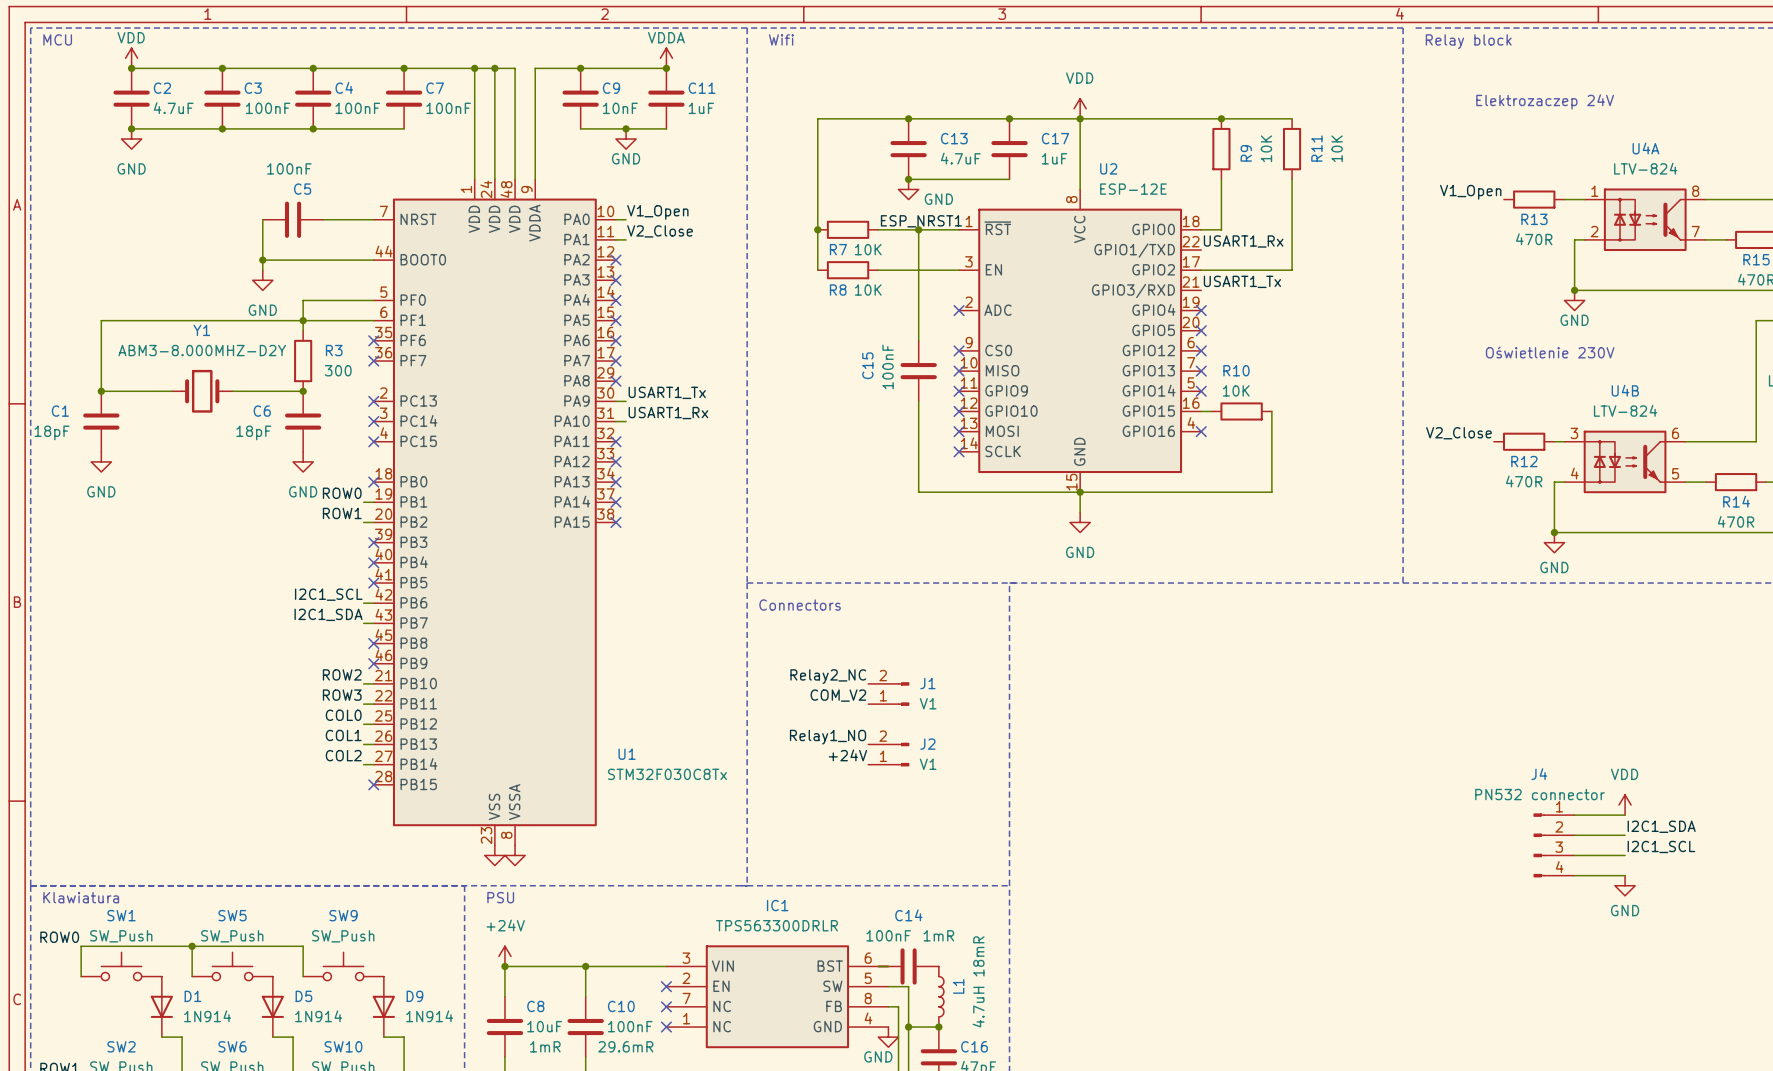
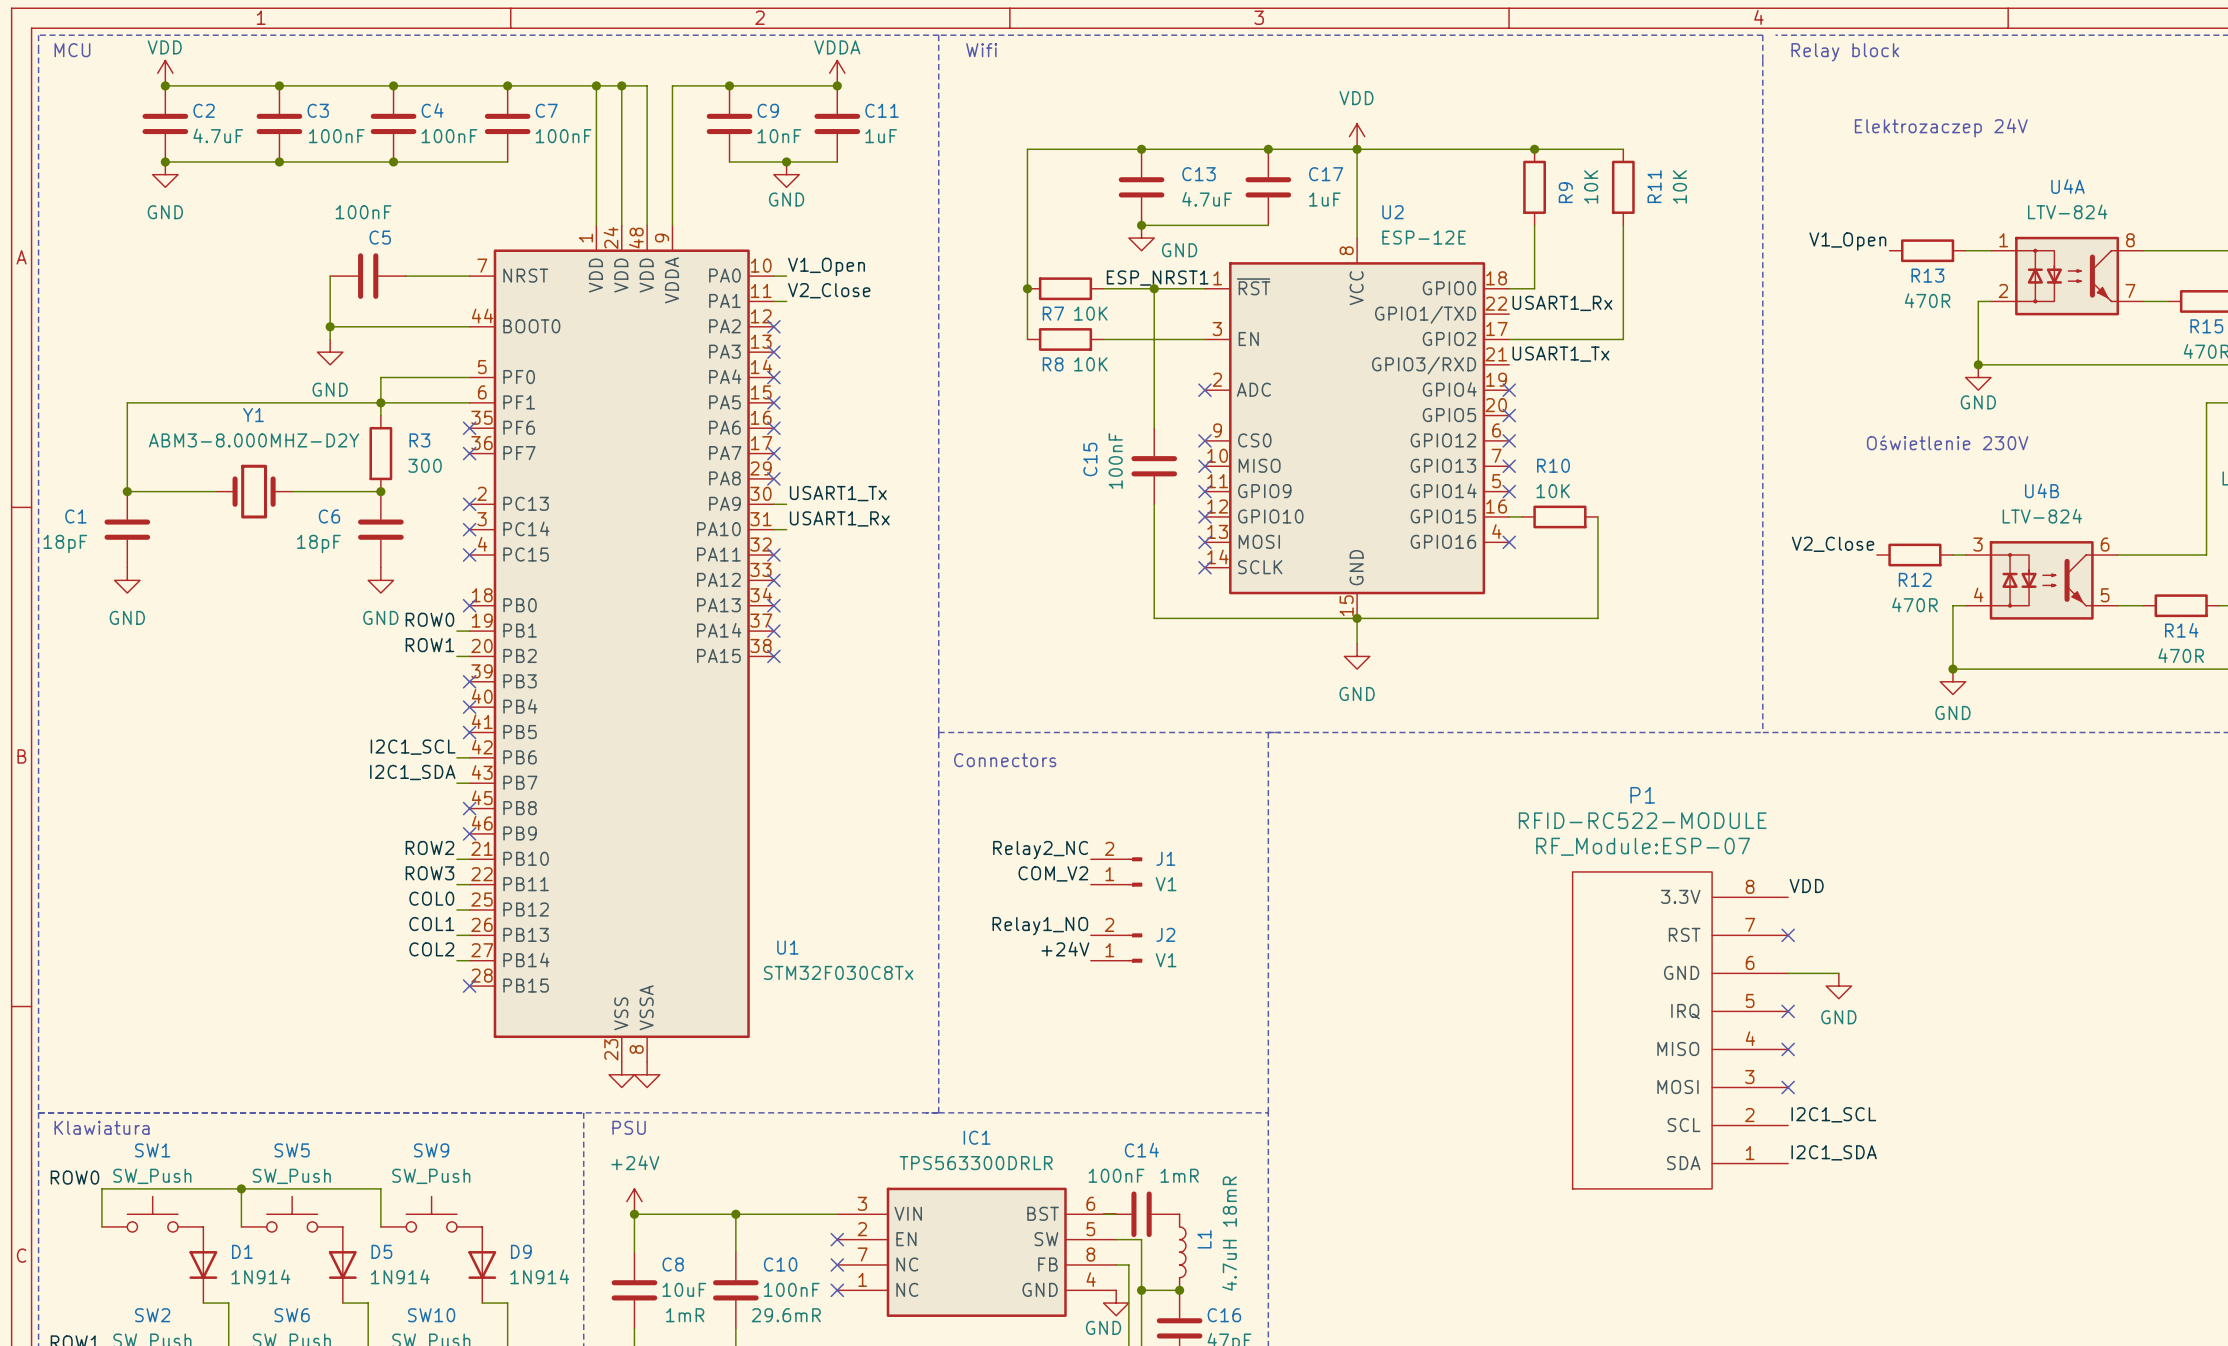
label: none -> VDD (1806, 886)
no-connect mark: none -> (1788, 935)
wire: none -> (1788, 973) (1838, 973)
no-connect mark: none -> (1788, 1011)
power symbol: VDD (1625, 805) -> none
wire: (1574, 815) (1625, 815) -> none
P1: none -> RFID-RC522-MODULE (1680, 1030)
label: I2C1_SDA (1661, 826) -> none
no-connect mark: none -> (1788, 1049)
wire: (1574, 835) (1625, 835) -> none
J4: PN532 connector (1554, 845) -> none
label: I2C1_SCL (1661, 846) -> none
wire: (1574, 855) (1625, 855) -> none
no-connect mark: none -> (1788, 1087)
wire: (1574, 875) (1625, 875) -> none
power symbol position: GND (1625, 885) -> GND (1838, 986)
label: none -> I2C1_SCL (1833, 1114)
label: none -> I2C1_SDA (1834, 1152)

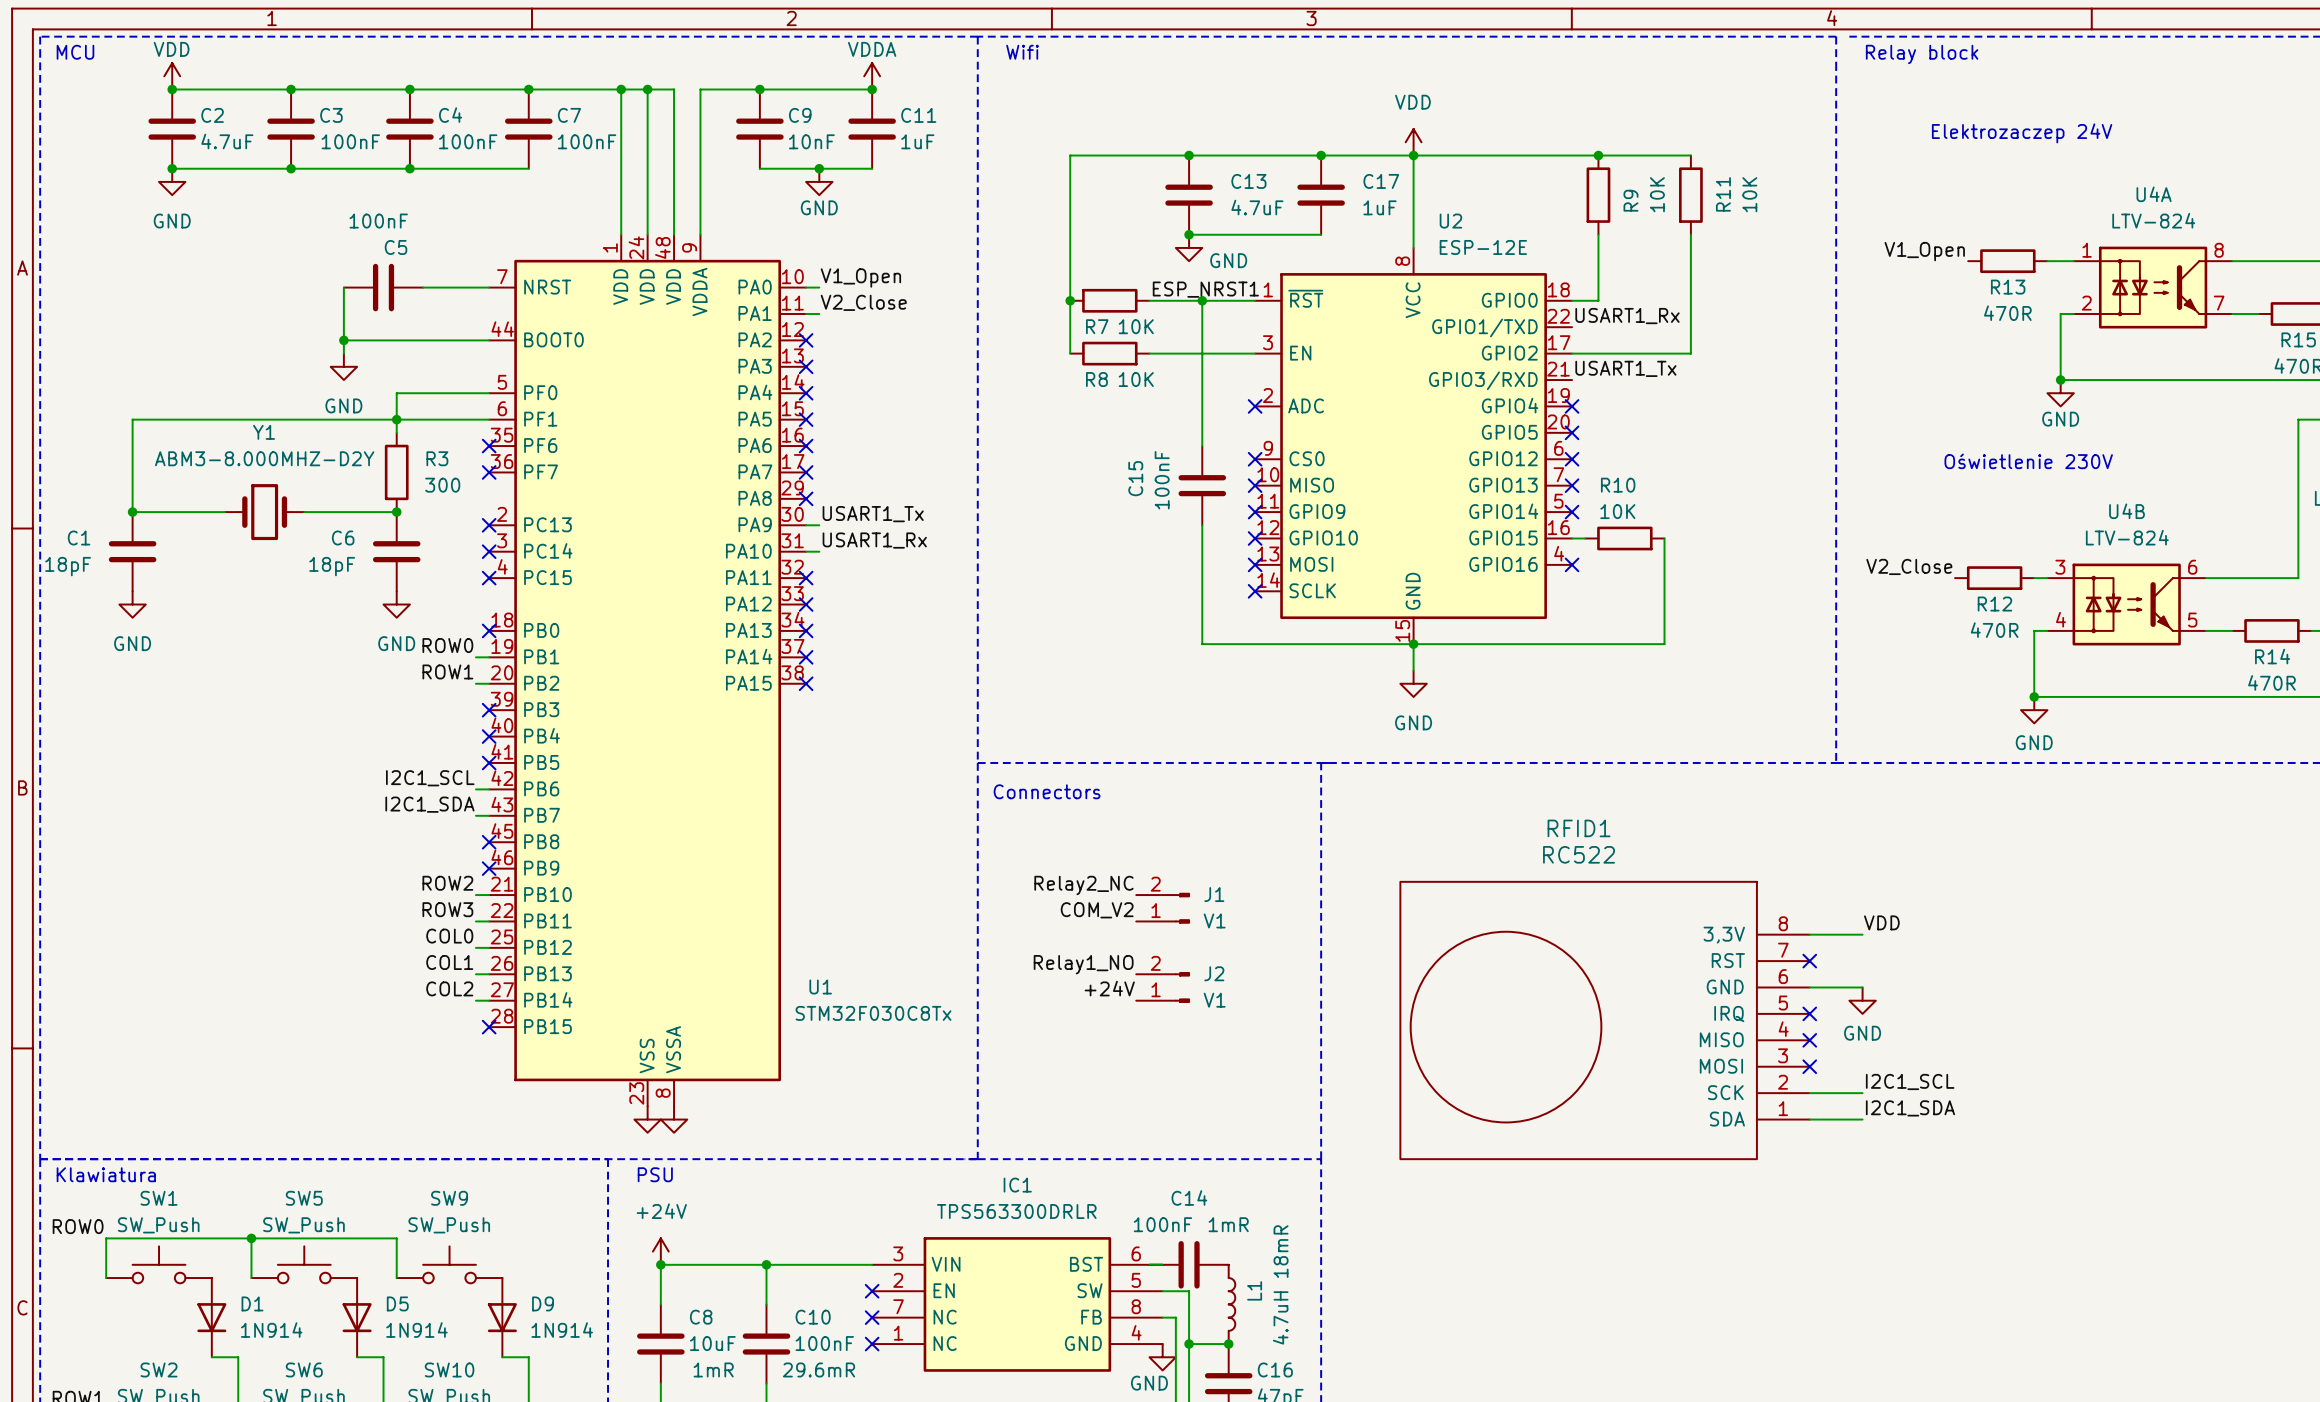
no-connect mark: none -> (1809, 961)
no-connect mark: (1788, 935) -> none
no-connect mark: none -> (1809, 1013)
wire: (1788, 973) (1838, 973) -> (1809, 987) (1862, 987)
RFID1: none -> RC522 (1605, 1020)
power symbol position: GND (1838, 986) -> GND (1862, 1000)
no-connect mark: none -> (1809, 1040)
no-connect mark: (1788, 1011) -> none
no-connect mark: none -> (1809, 1066)
P1: RFID-RC522-MODULE (1680, 1030) -> none
no-connect mark: (1788, 1049) -> none
wire: none -> (1809, 1119) (1862, 1119)
no-connect mark: (1788, 1087) -> none
label position: I2C1_SCL (1833, 1114) -> I2C1_SCL (1910, 1081)
label position: I2C1_SDA (1834, 1152) -> I2C1_SDA (1910, 1108)

